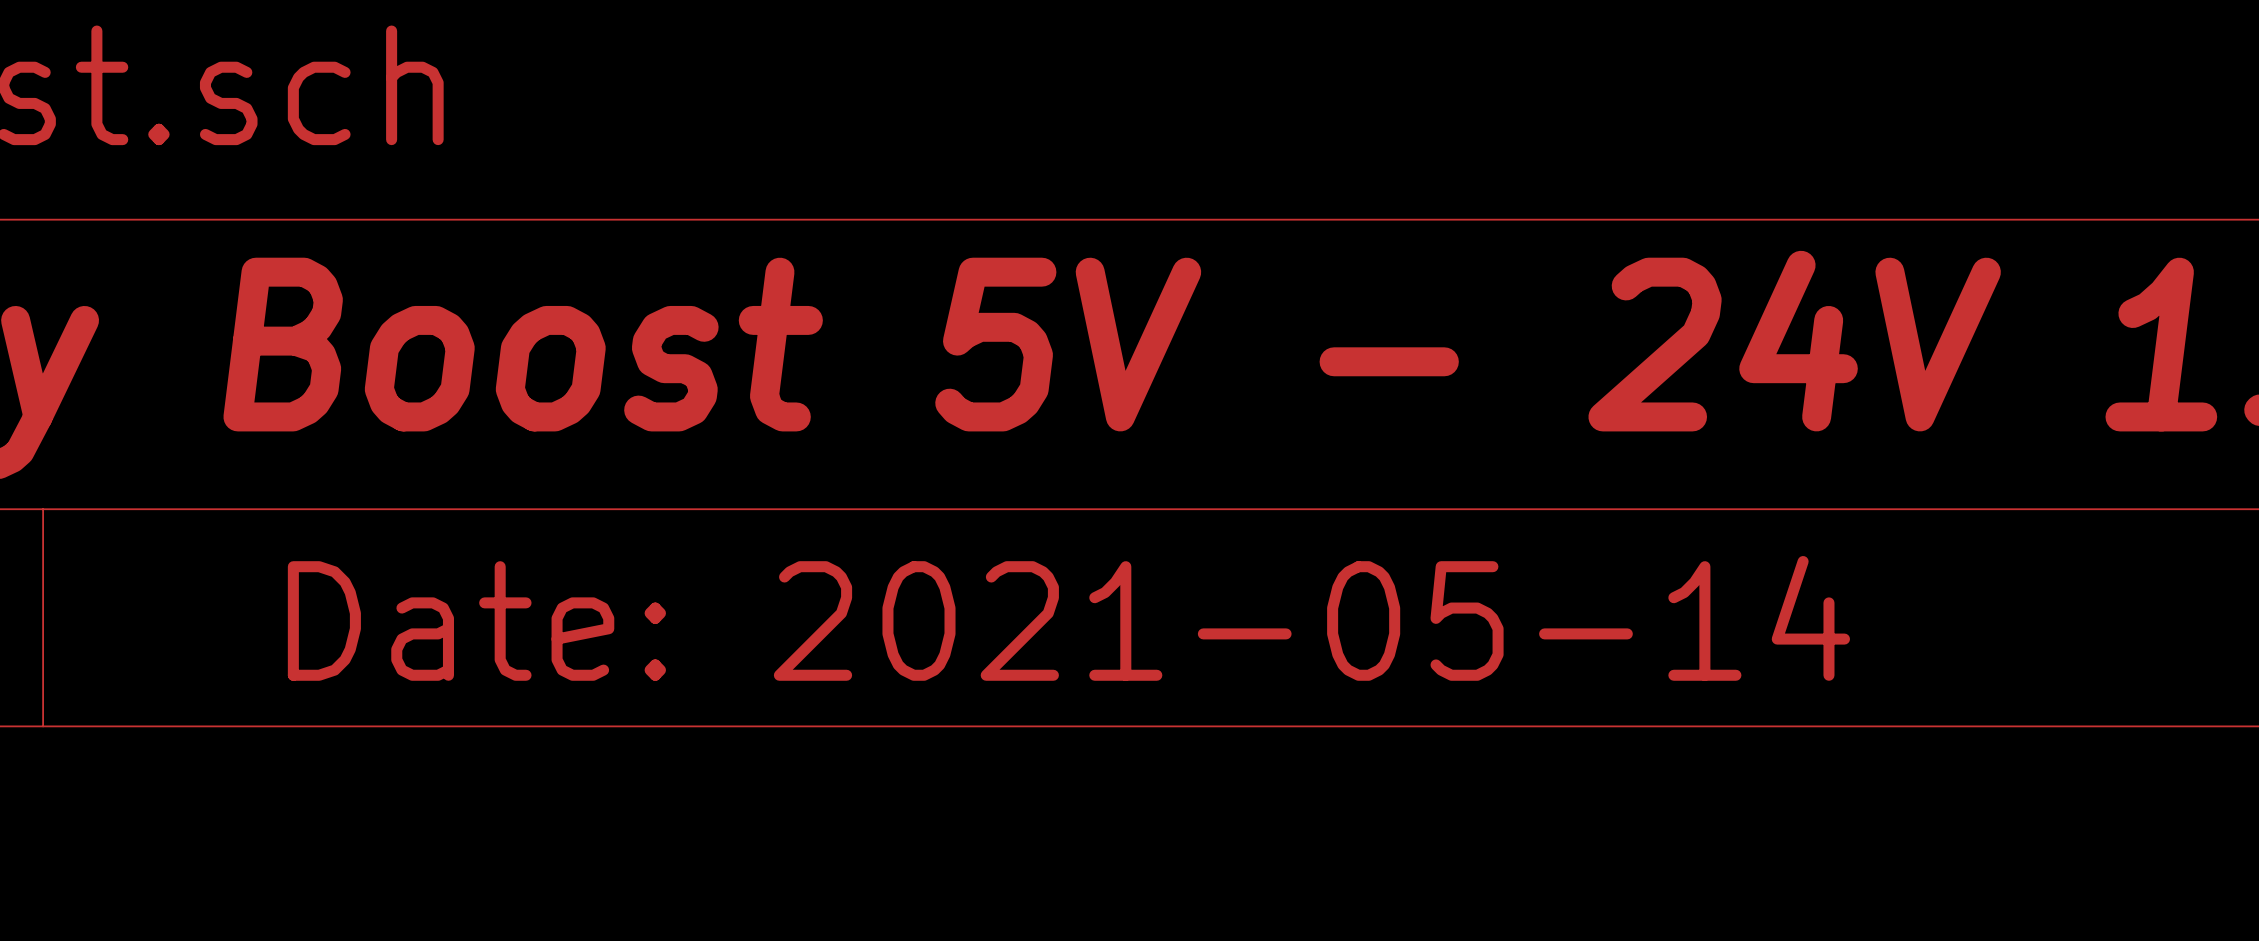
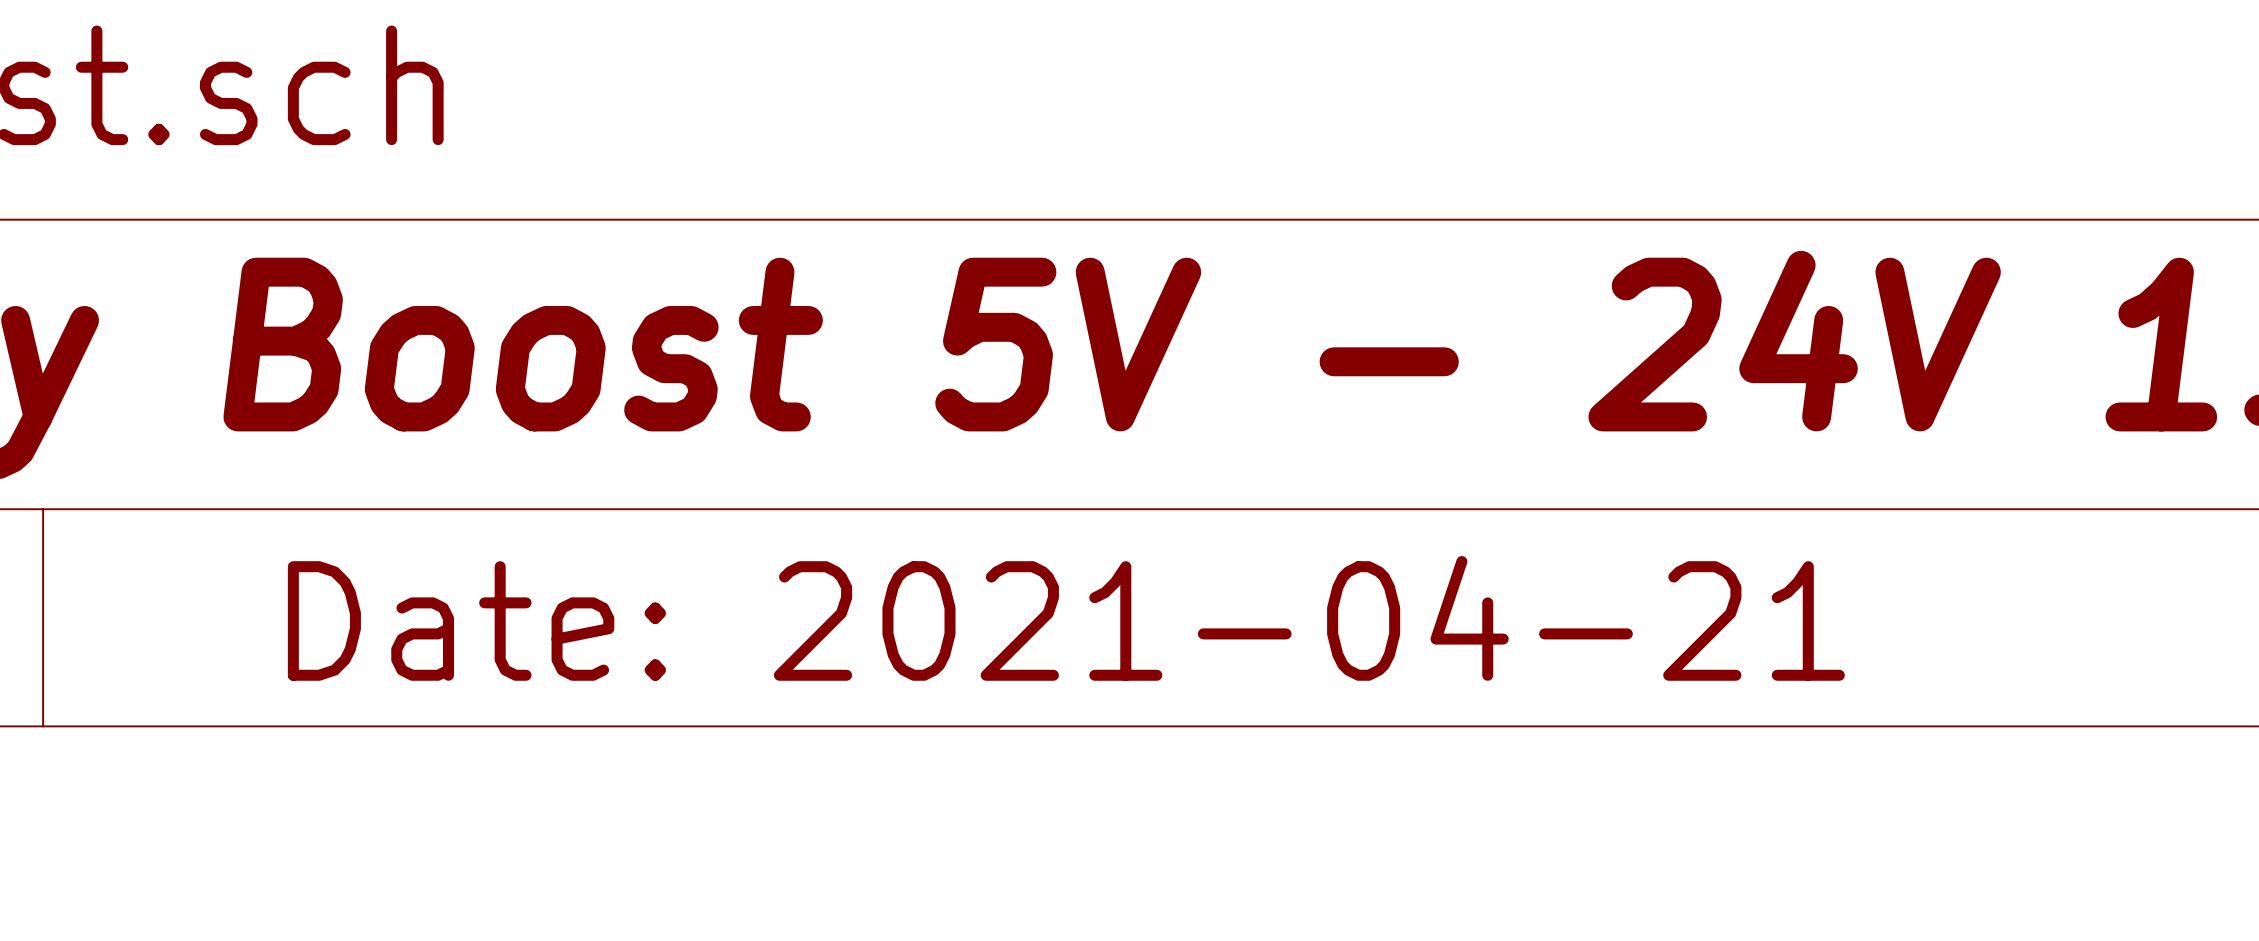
title block: Date: 2021-05-14 (1068, 618) -> Date: 2021-04-21 (1066, 618)

